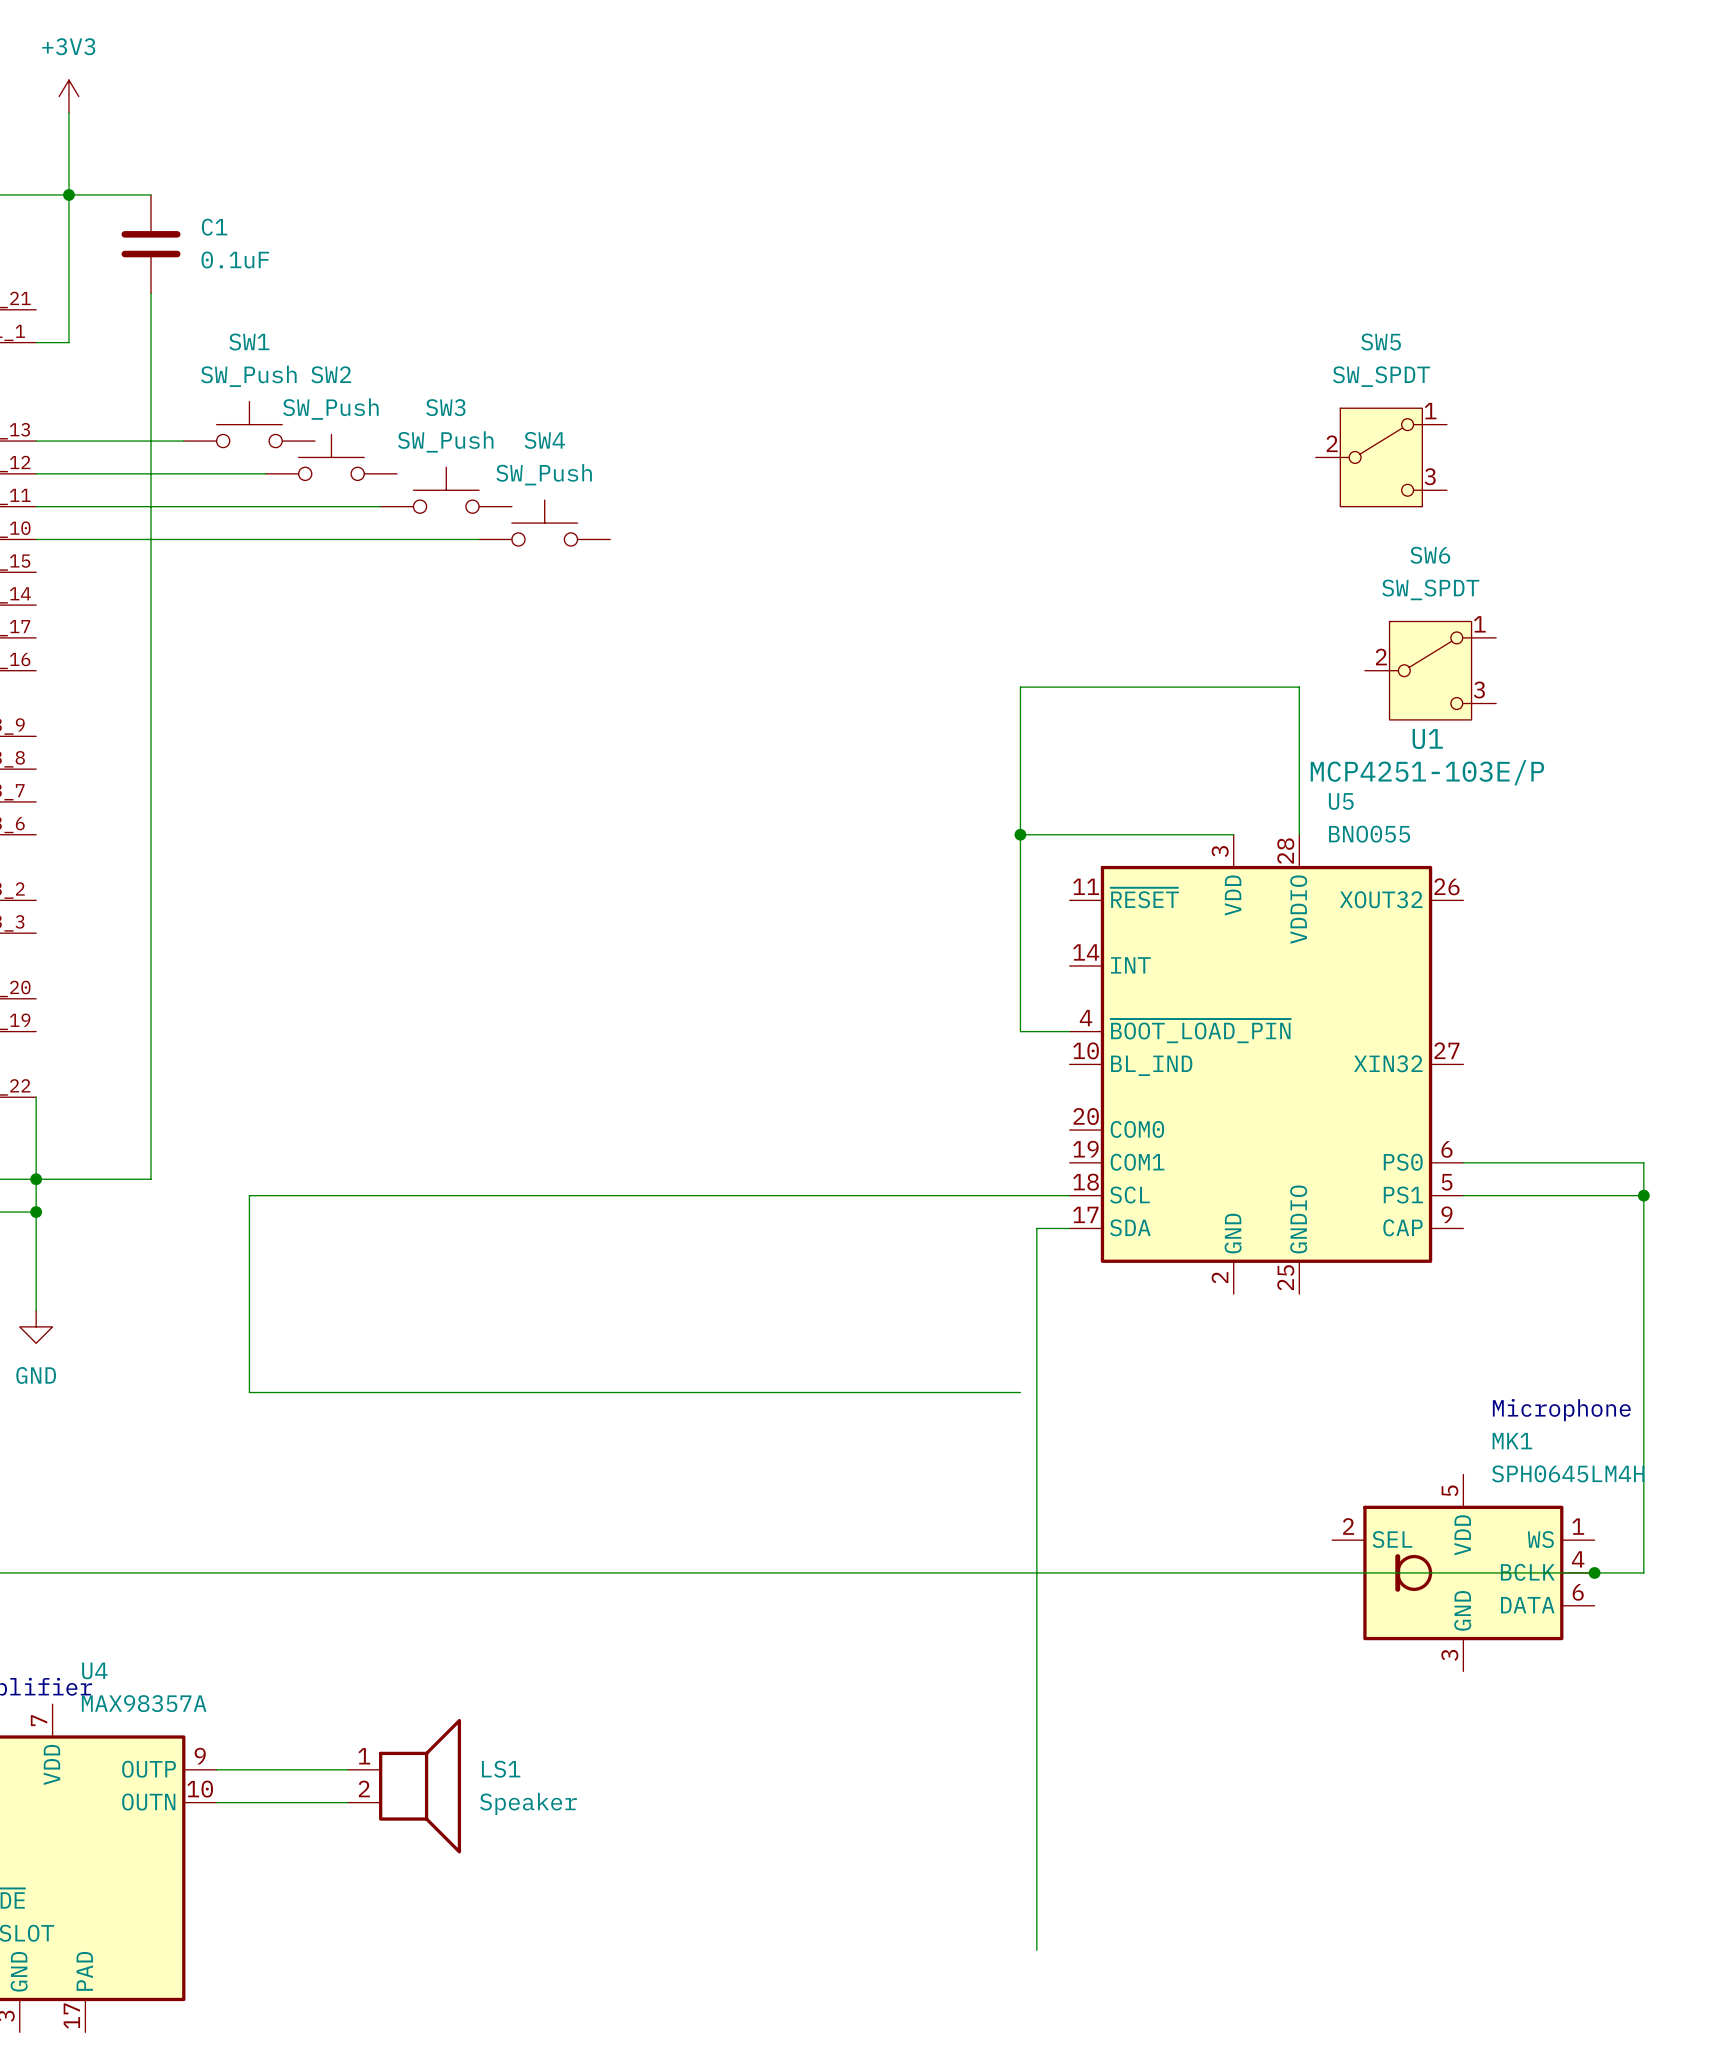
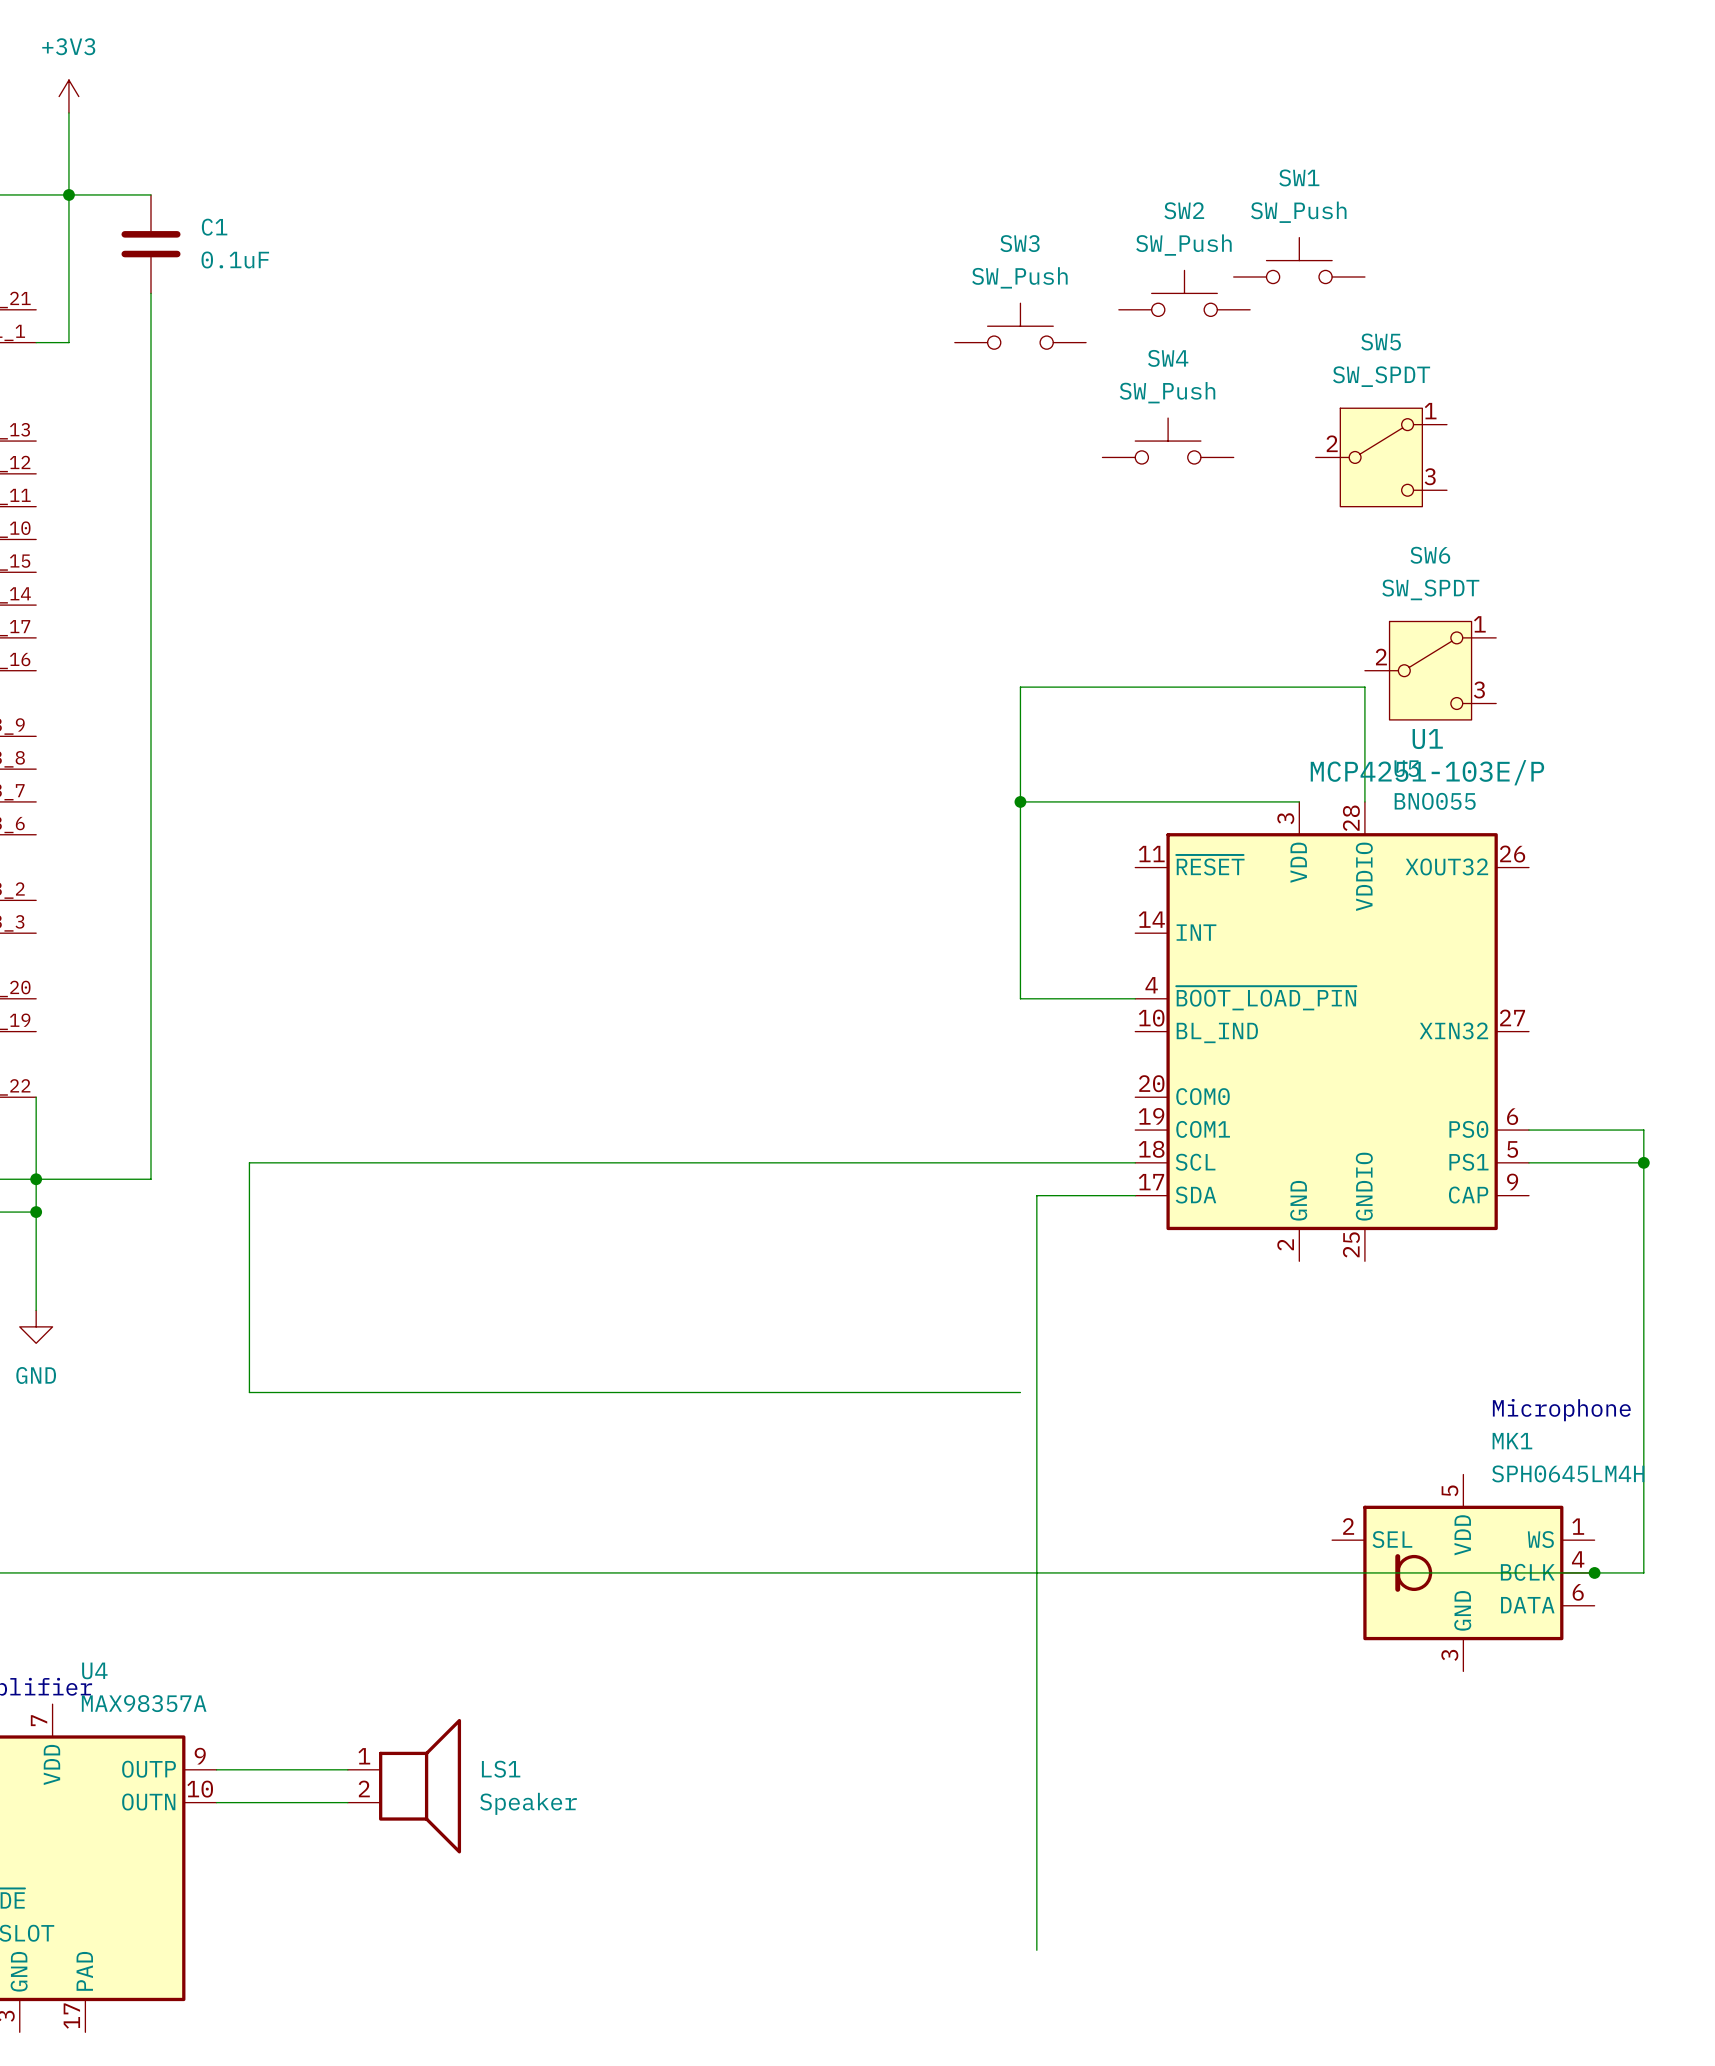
SW1 position: (249, 424) -> (1299, 260)
wire: (36, 441) (183, 441) -> none
SW2 position: (331, 457) -> (1184, 293)
wire: (36, 473) (265, 473) -> none
SW3 position: (446, 490) -> (1020, 326)
wire: (36, 506) (380, 506) -> none
SW4 position: (544, 523) -> (1168, 441)
wire: (36, 539) (479, 539) -> none
wire: (1299, 687) (1299, 834) -> (1299, 687) (1364, 687) (1364, 801)
wire: none -> (1020, 801) (1299, 801)
wire: (1020, 834) (1233, 834) -> none
junction position: (1020, 834) -> (1020, 801)
wire: (1020, 998) (1020, 1031) (1069, 1031) -> (1020, 998) (1135, 998)
U5 position: (1266, 1064) -> (1332, 1031)
wire: none -> (1528, 1130) (1643, 1130) (1643, 1162)
wire: (249, 1195) (1036, 1195) -> (249, 1195) (249, 1162) (1135, 1162)
wire: (1463, 1195) (1643, 1195) -> none
junction position: (1643, 1195) -> (1643, 1162)
wire: (1036, 1228) (1069, 1228) -> (1036, 1228) (1036, 1195)

